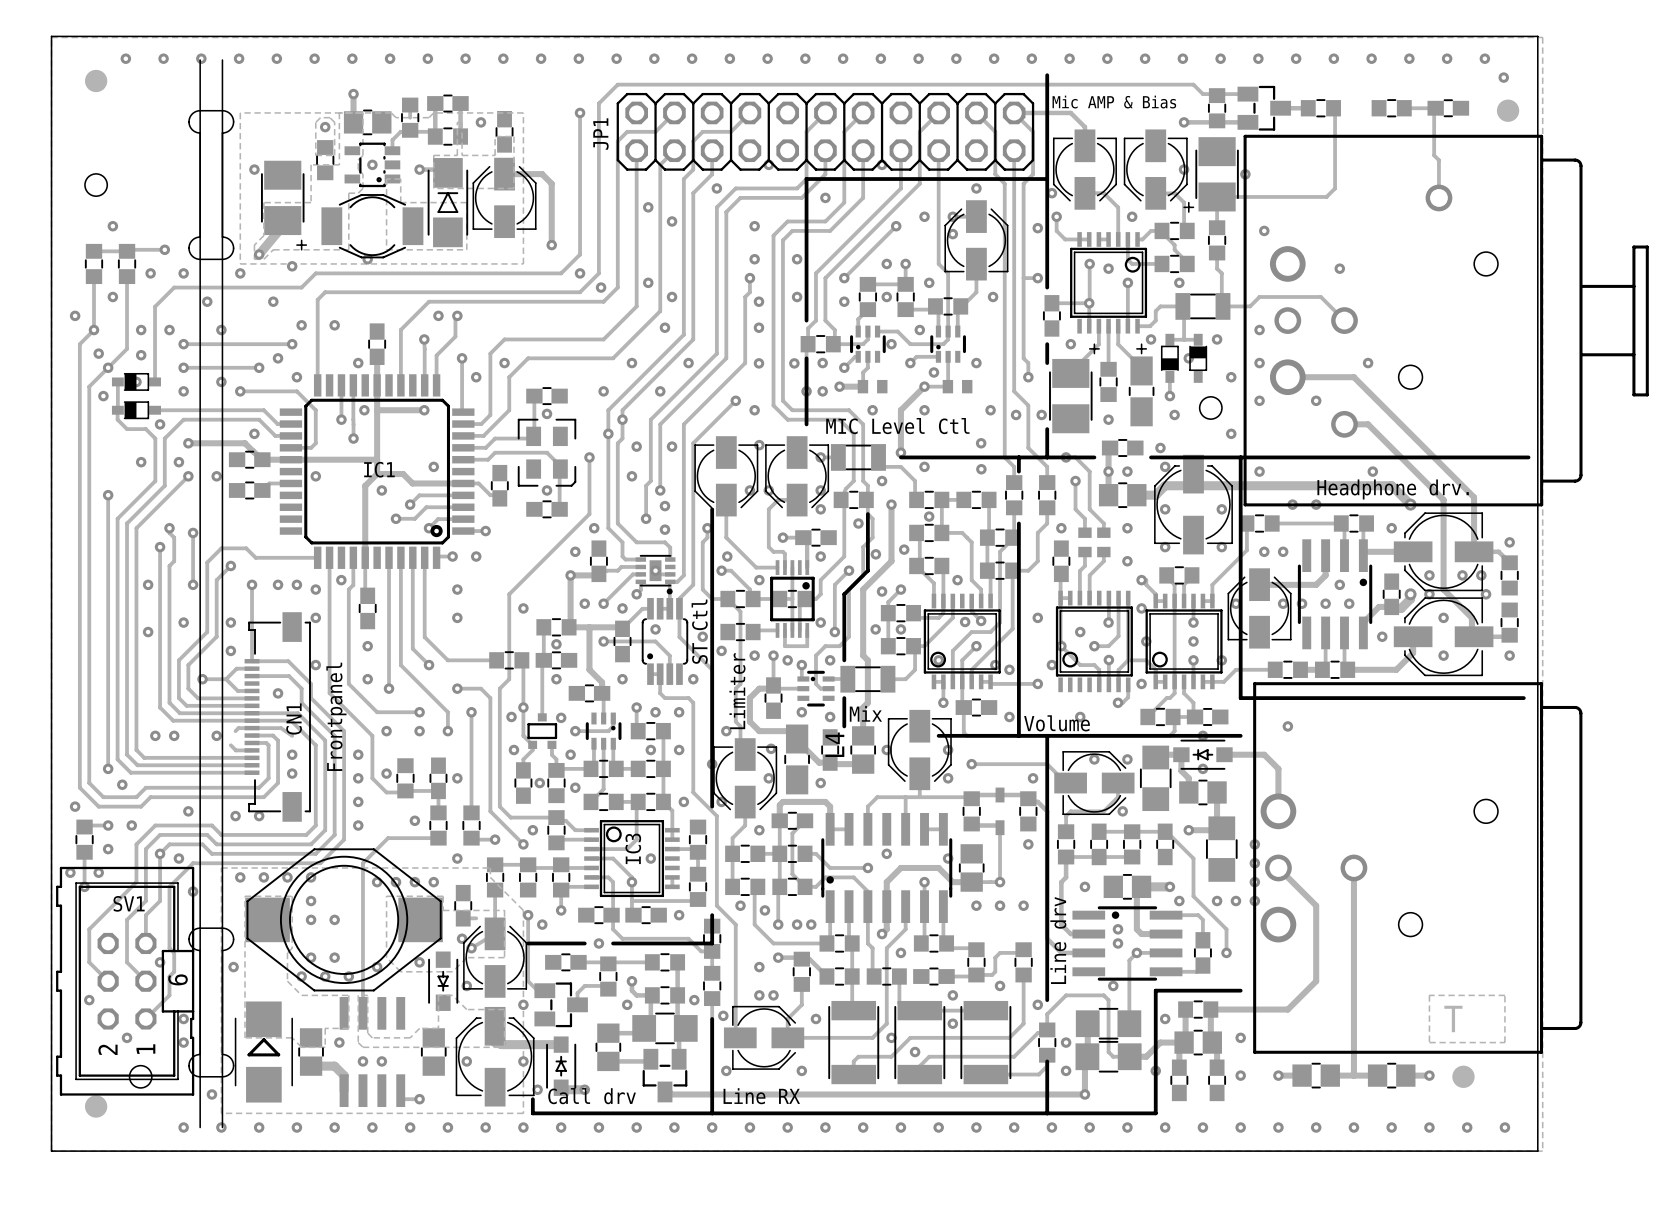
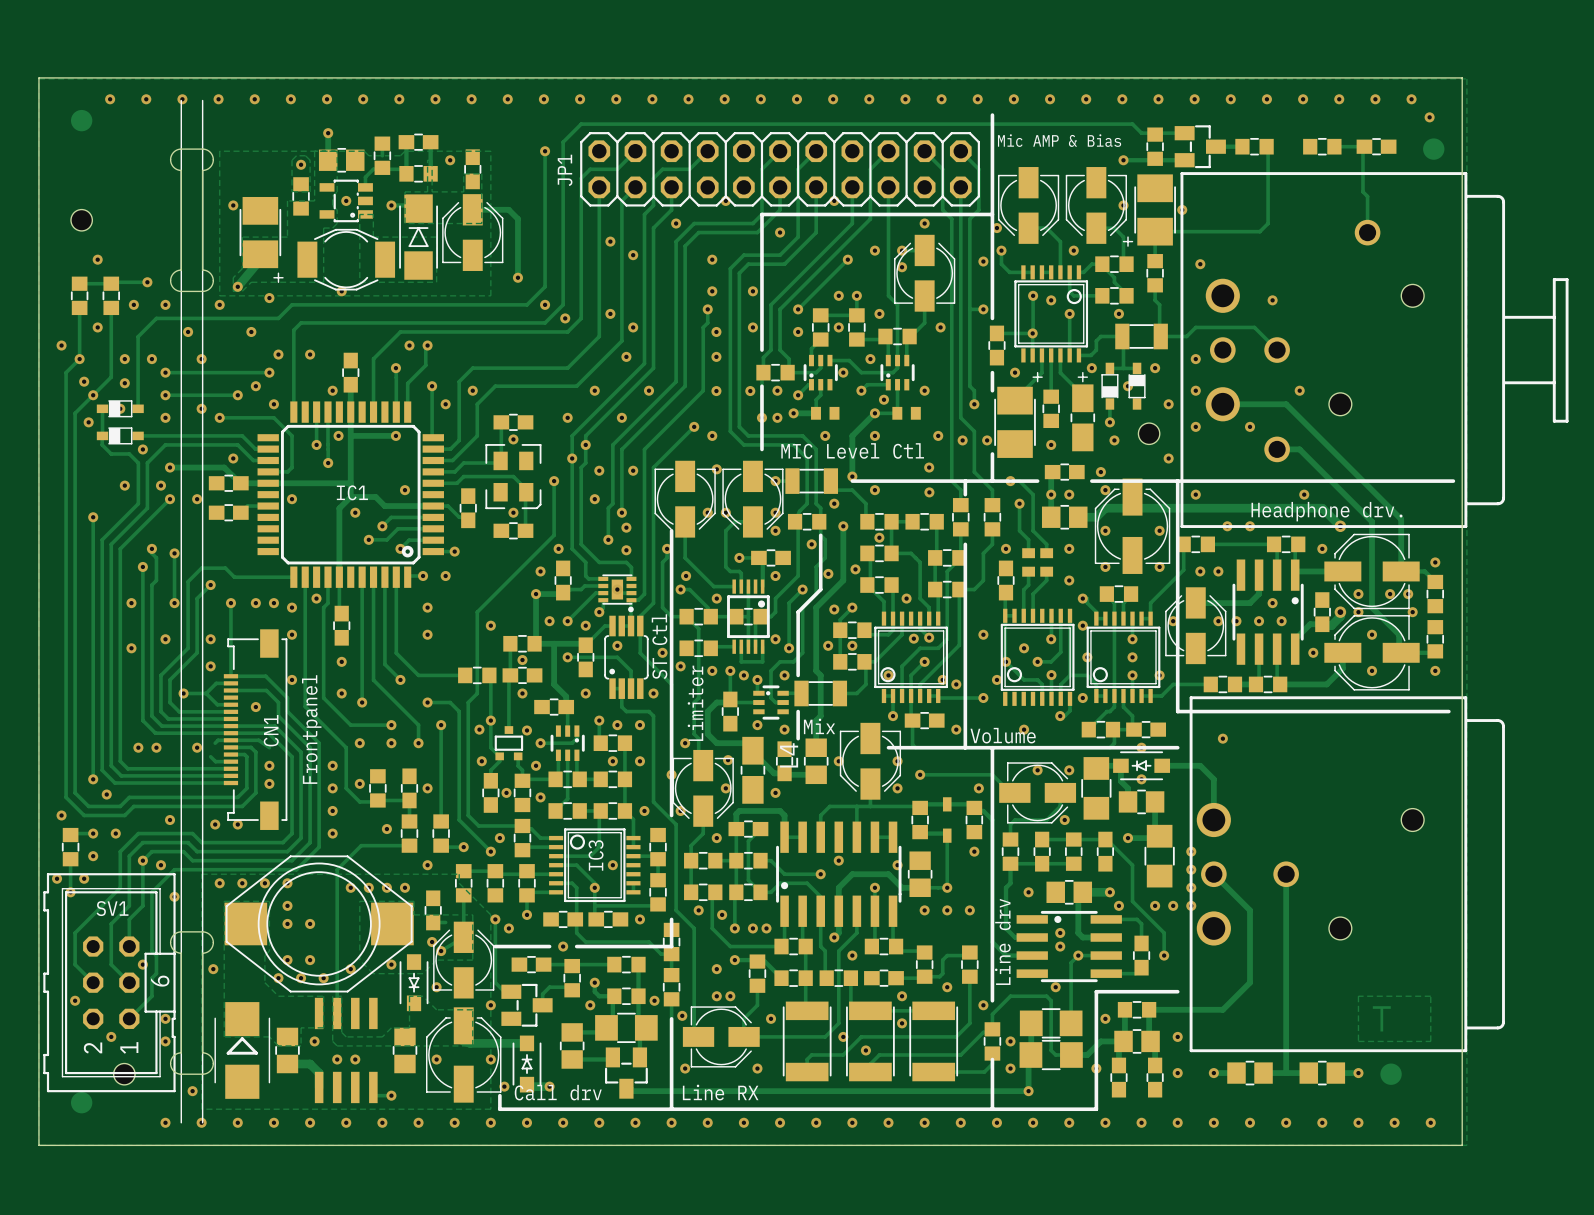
track: (1014, 112) (1070, 112) (1084, 127) (1084, 145) -> none

